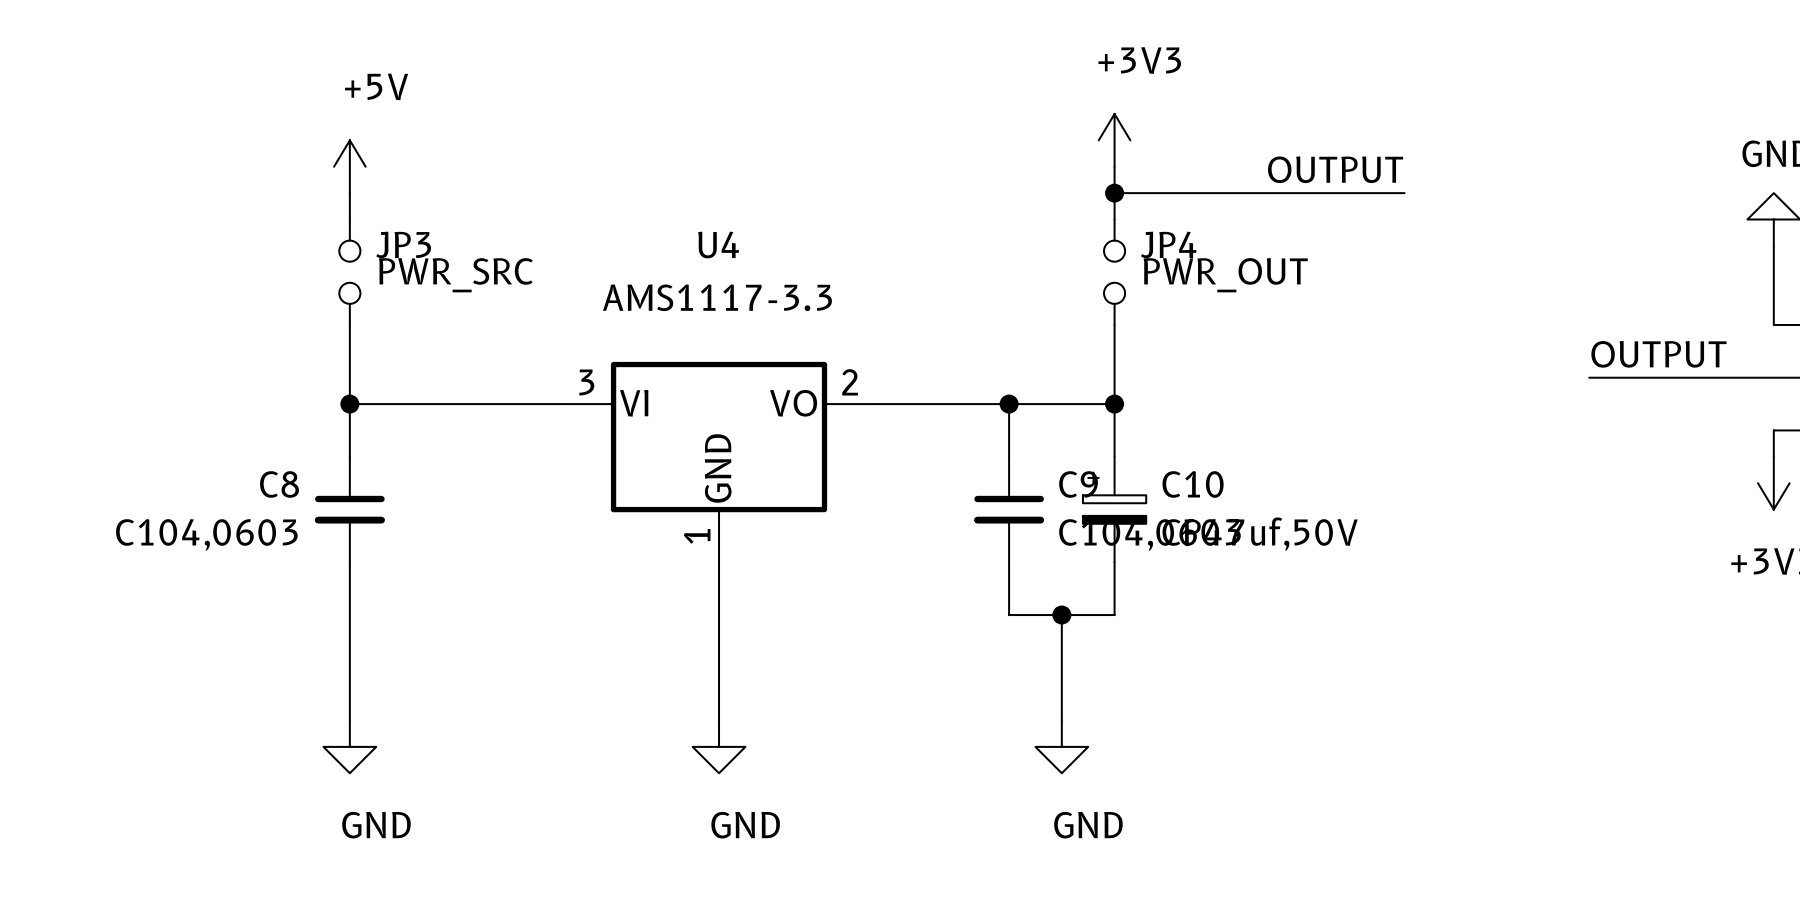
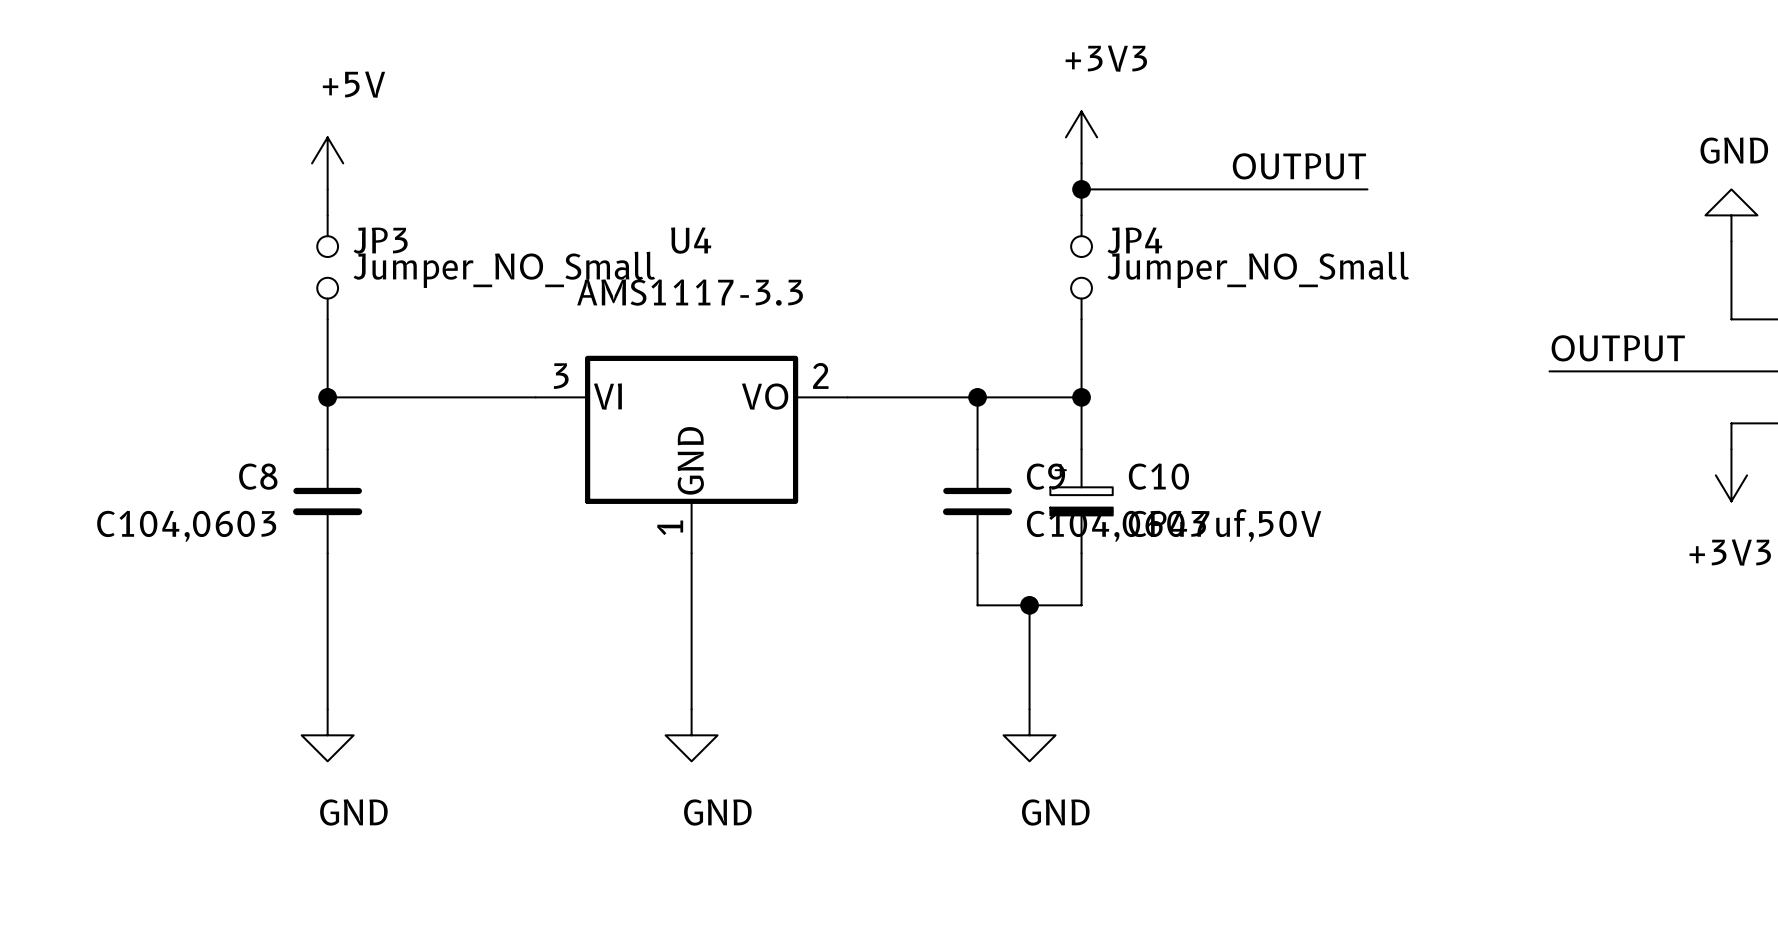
JP3 value: PWR_SRC (455, 275) -> Jumper_NO_Small (504, 269)
JP4 value: PWR_OUT (1225, 275) -> Jumper_NO_Small (1258, 269)

